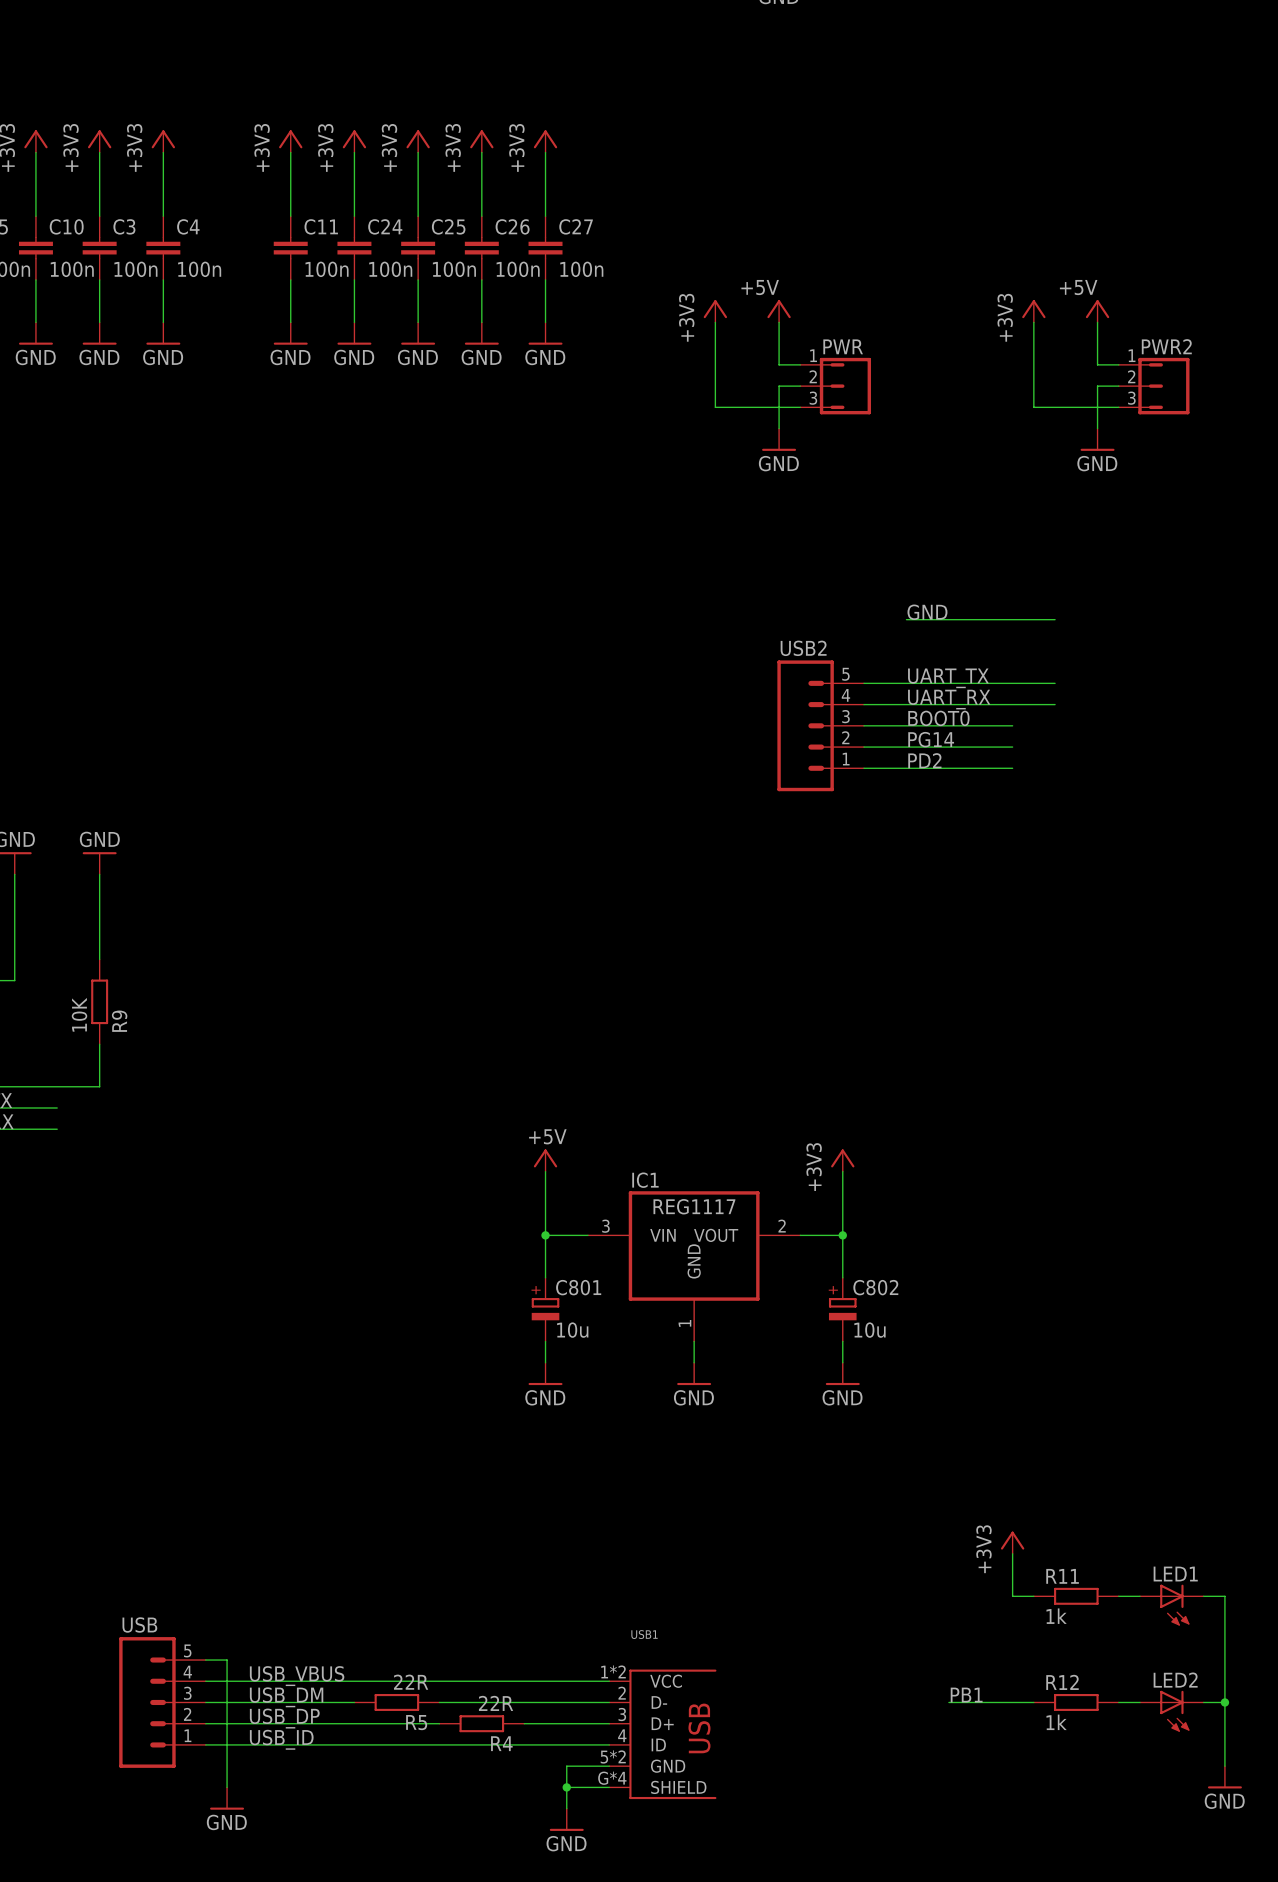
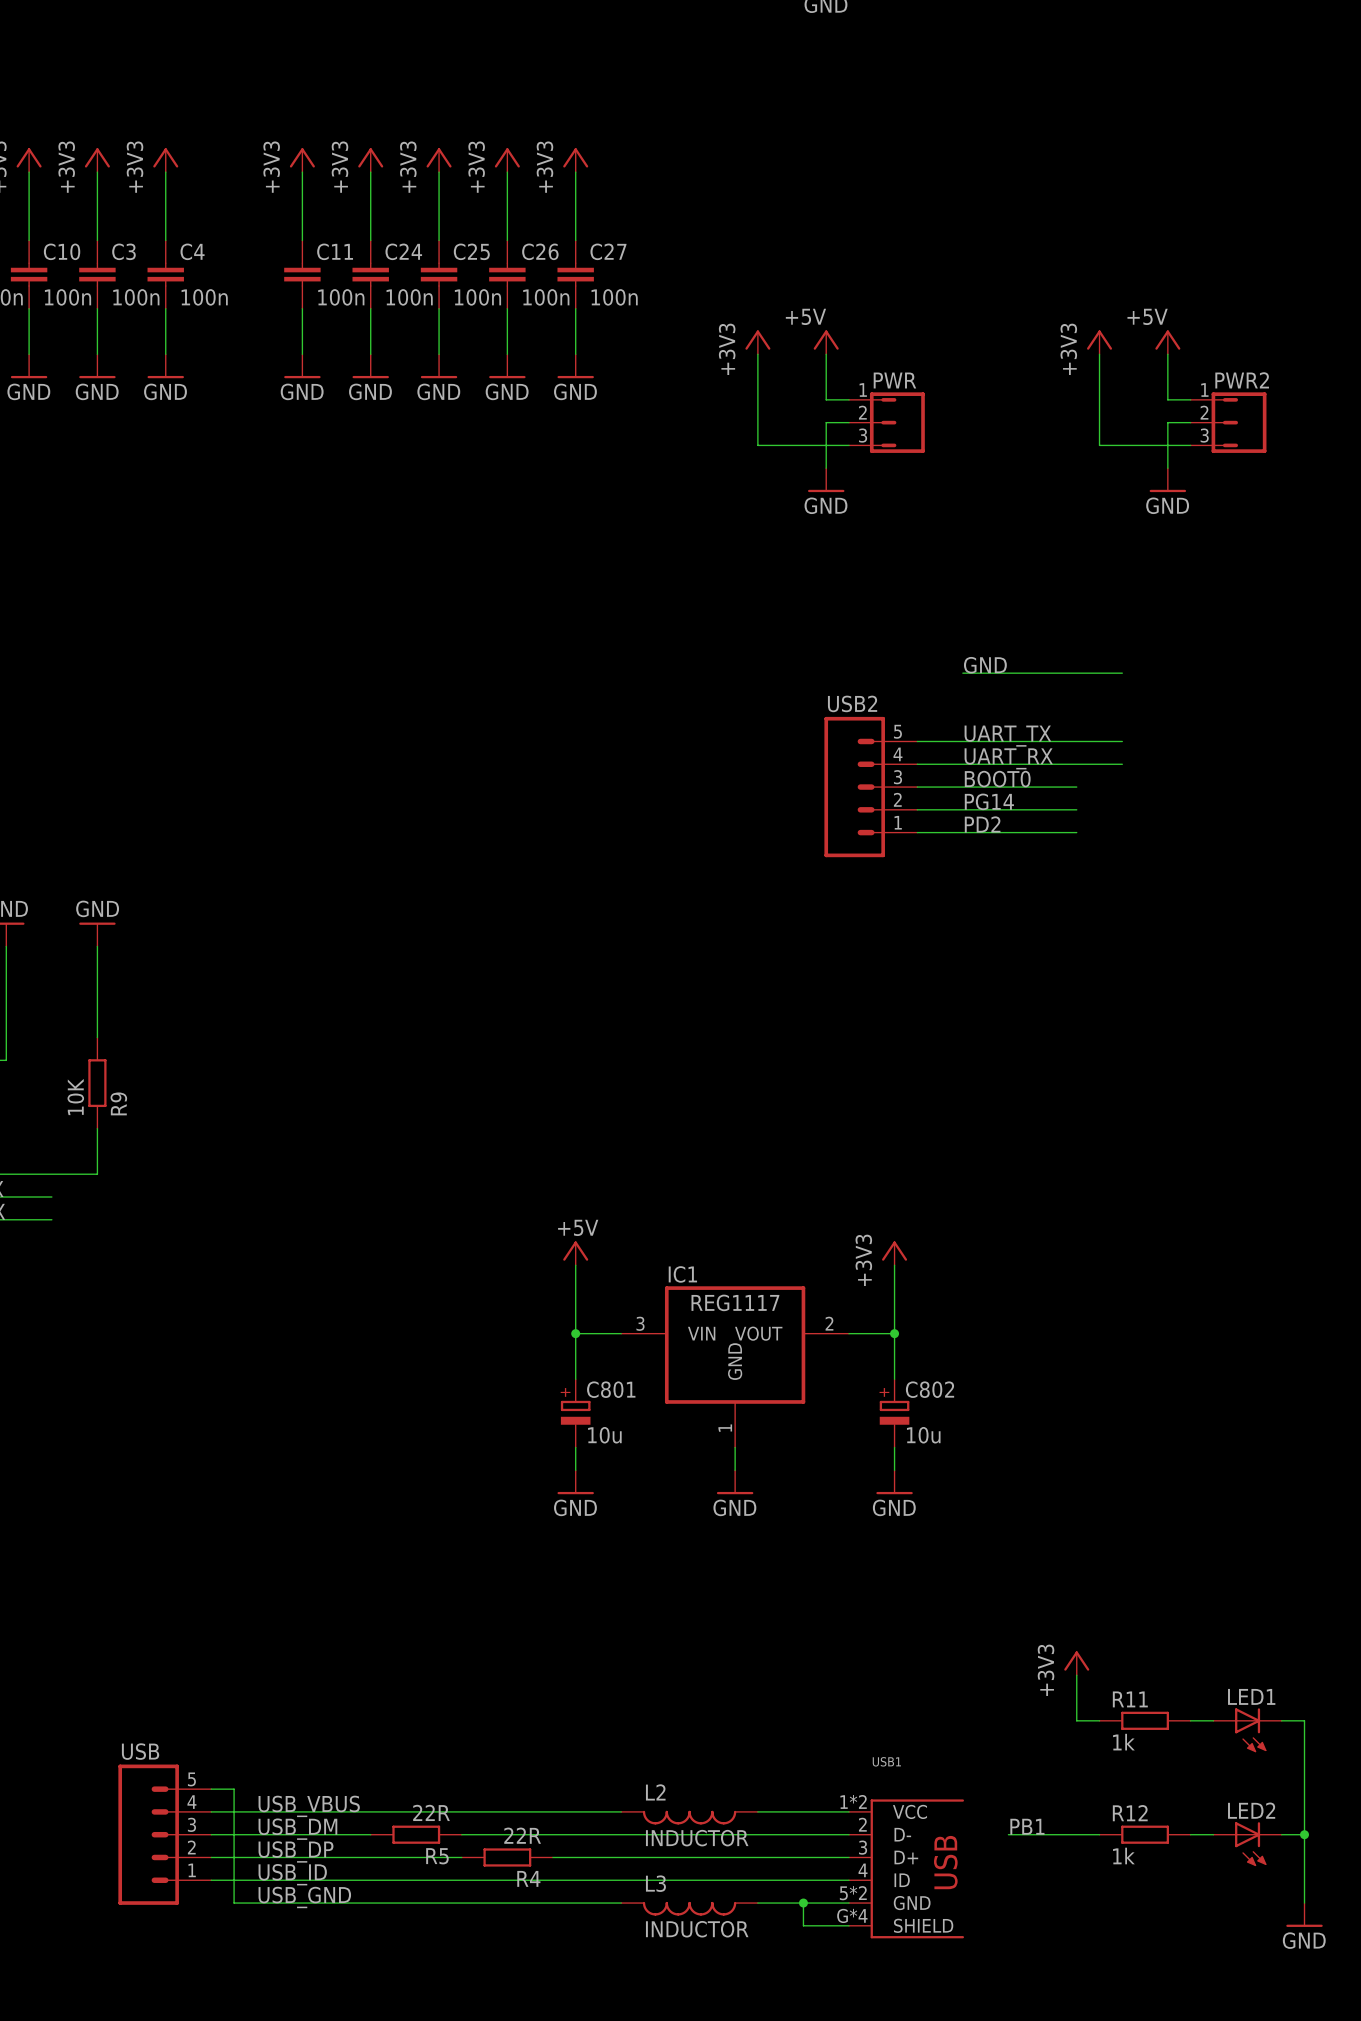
wire: none -> (757, 1811) (849, 1811)
L2: none -> INDUCTOR (689, 1817)
wire: none -> (644, 1834) (849, 1834)
wire: none -> (644, 1857) (849, 1857)
USB1 position: (662, 1734) -> (906, 1868)
wire: none -> (644, 1880) (849, 1880)
label: none -> USB_GND (304, 1897)
wire: (227, 1766) (227, 1787) -> (234, 1903) (598, 1903)
wire: (566, 1766) (566, 1808) -> none
wire: none -> (757, 1903) (849, 1903)
wire: none -> (803, 1903) (803, 1925) (849, 1925)
junction: none -> (803, 1903)
L3: none -> INDUCTOR (689, 1908)
wire: (566, 1787) (609, 1787) -> none
junction: (566, 1787) -> none
power symbol: GND (227, 1798) -> none
power symbol: GND (566, 1819) -> none

